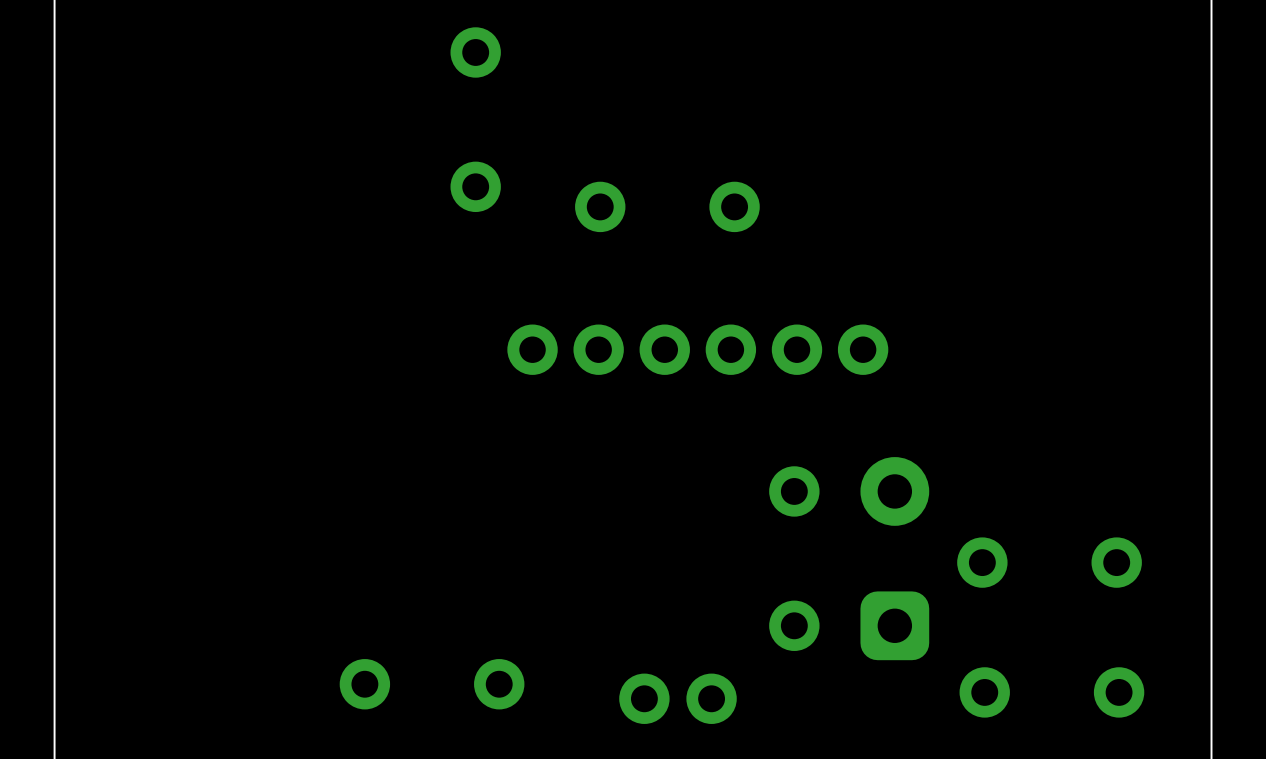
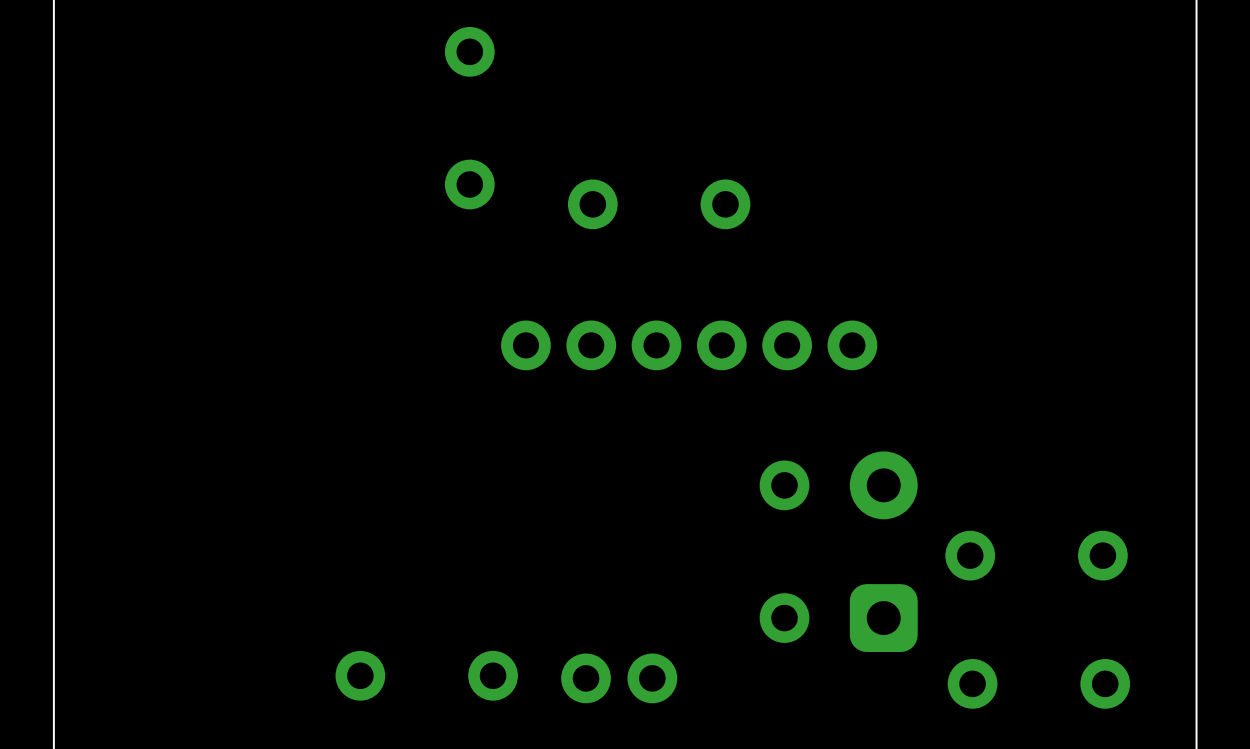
part position: (677, 698) -> (619, 678)

